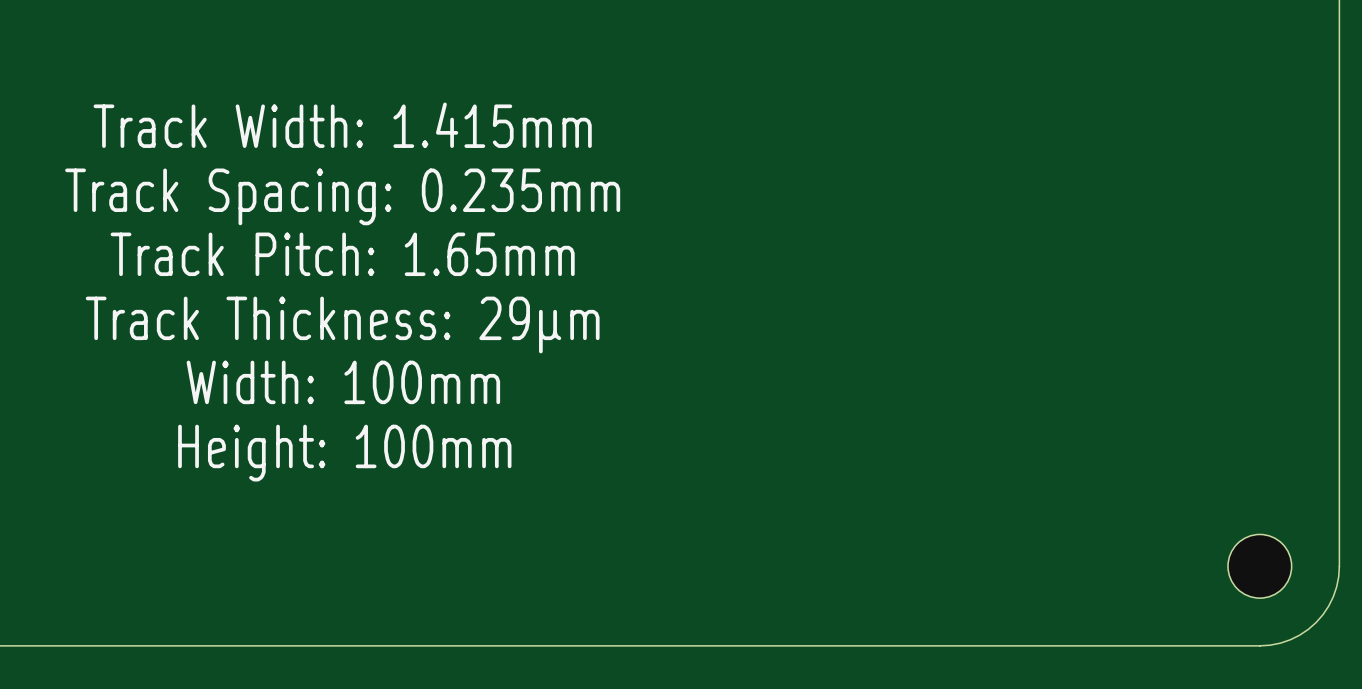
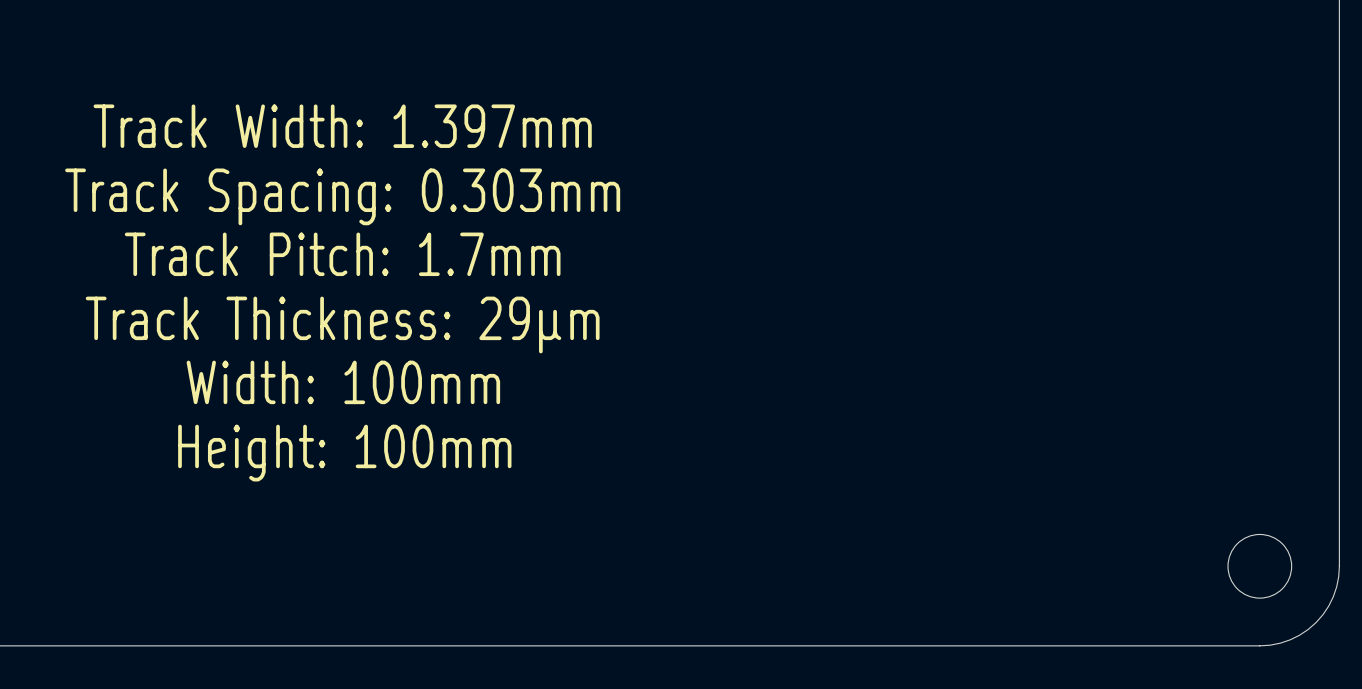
text: Track Width: 1.415mm (342, 125) -> Track Width: 1.397mm (342, 126)
text: Track Spacing: 0.235mm (342, 196) -> Track Spacing: 0.303mm (342, 196)
text: Track Pitch: 1.65mm (342, 254) -> Track Pitch: 1.7mm (342, 254)

